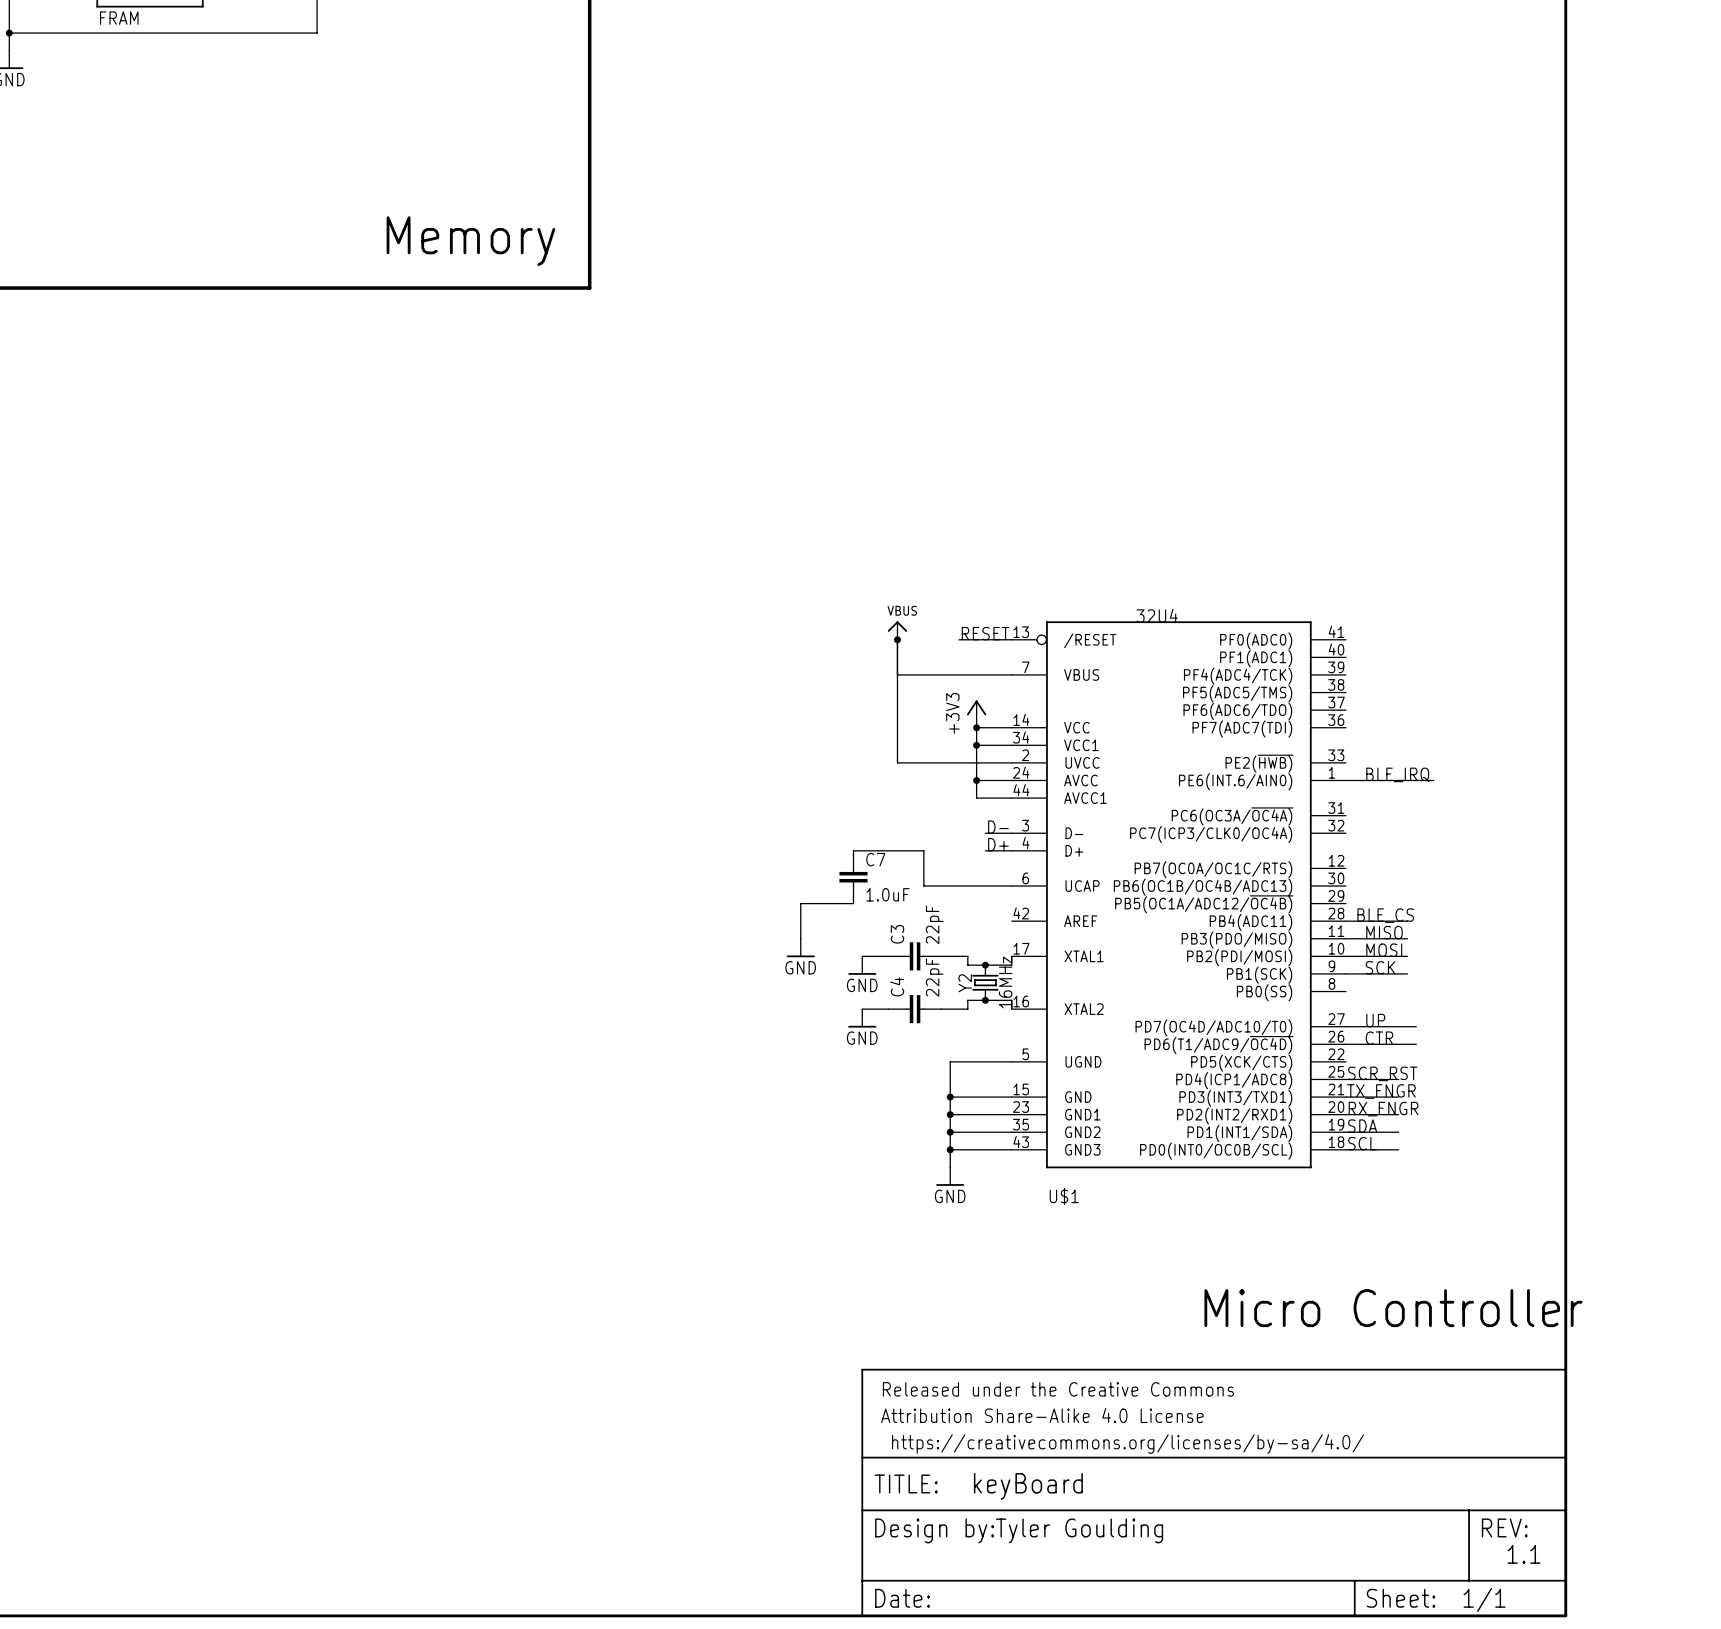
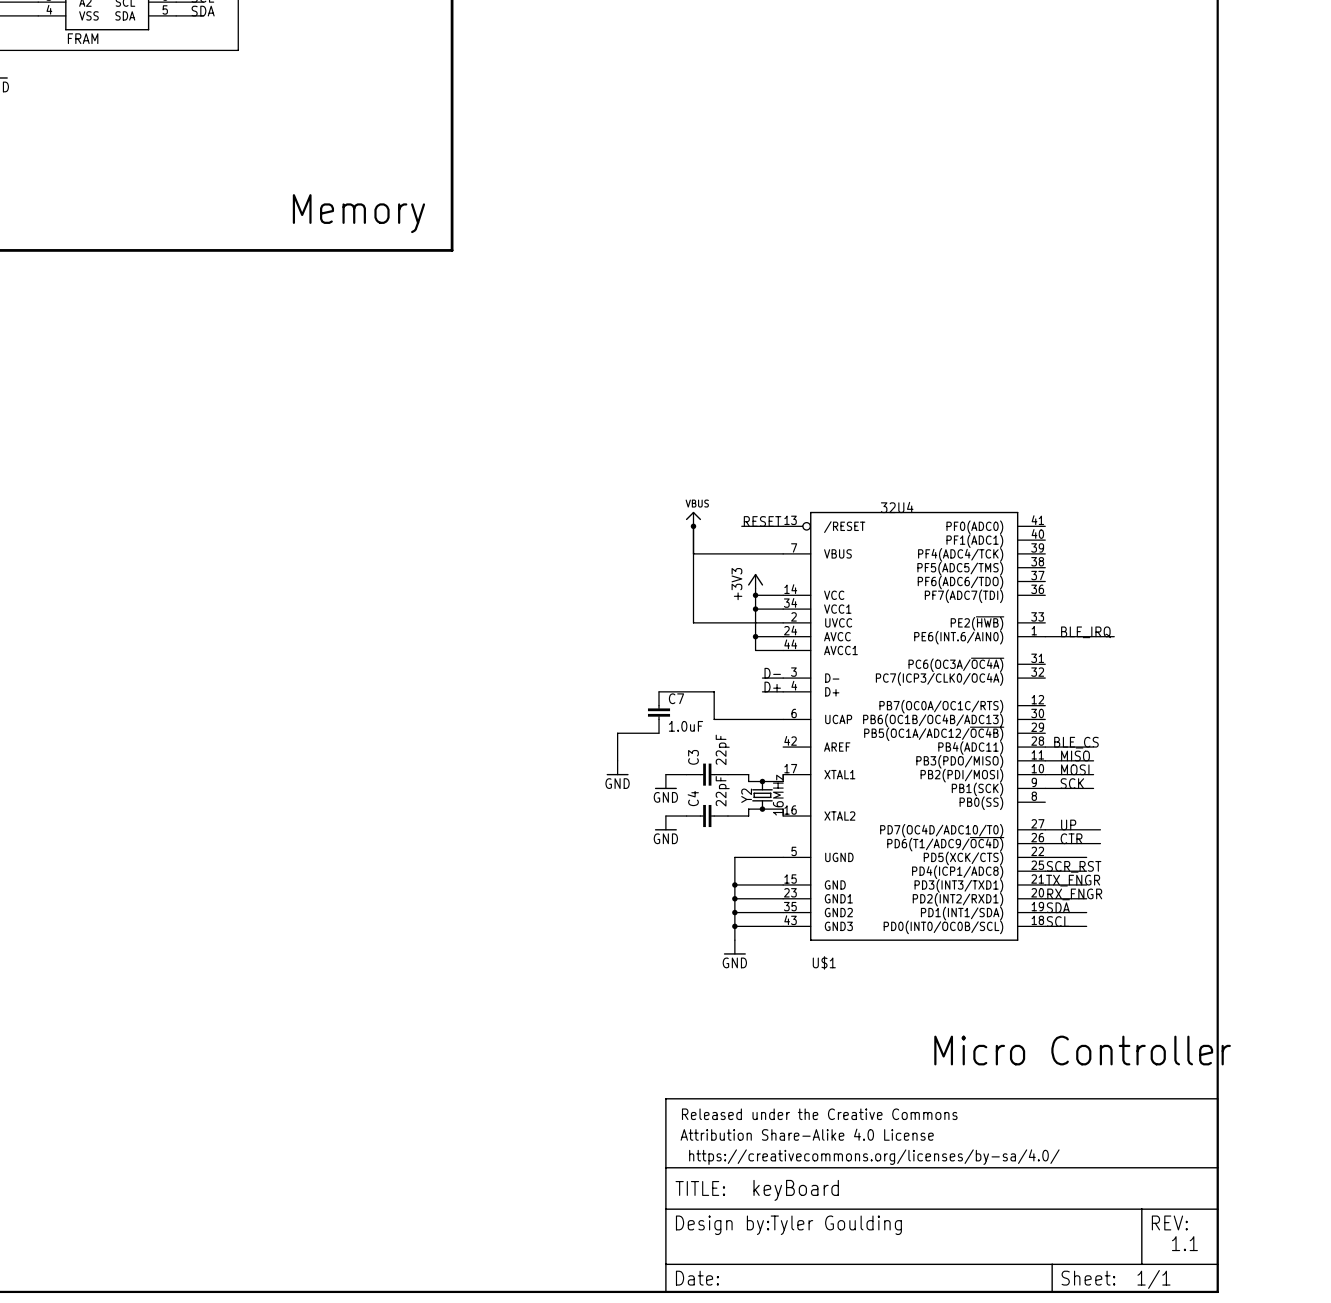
wire: none -> (1045, 857) (1086, 857)

